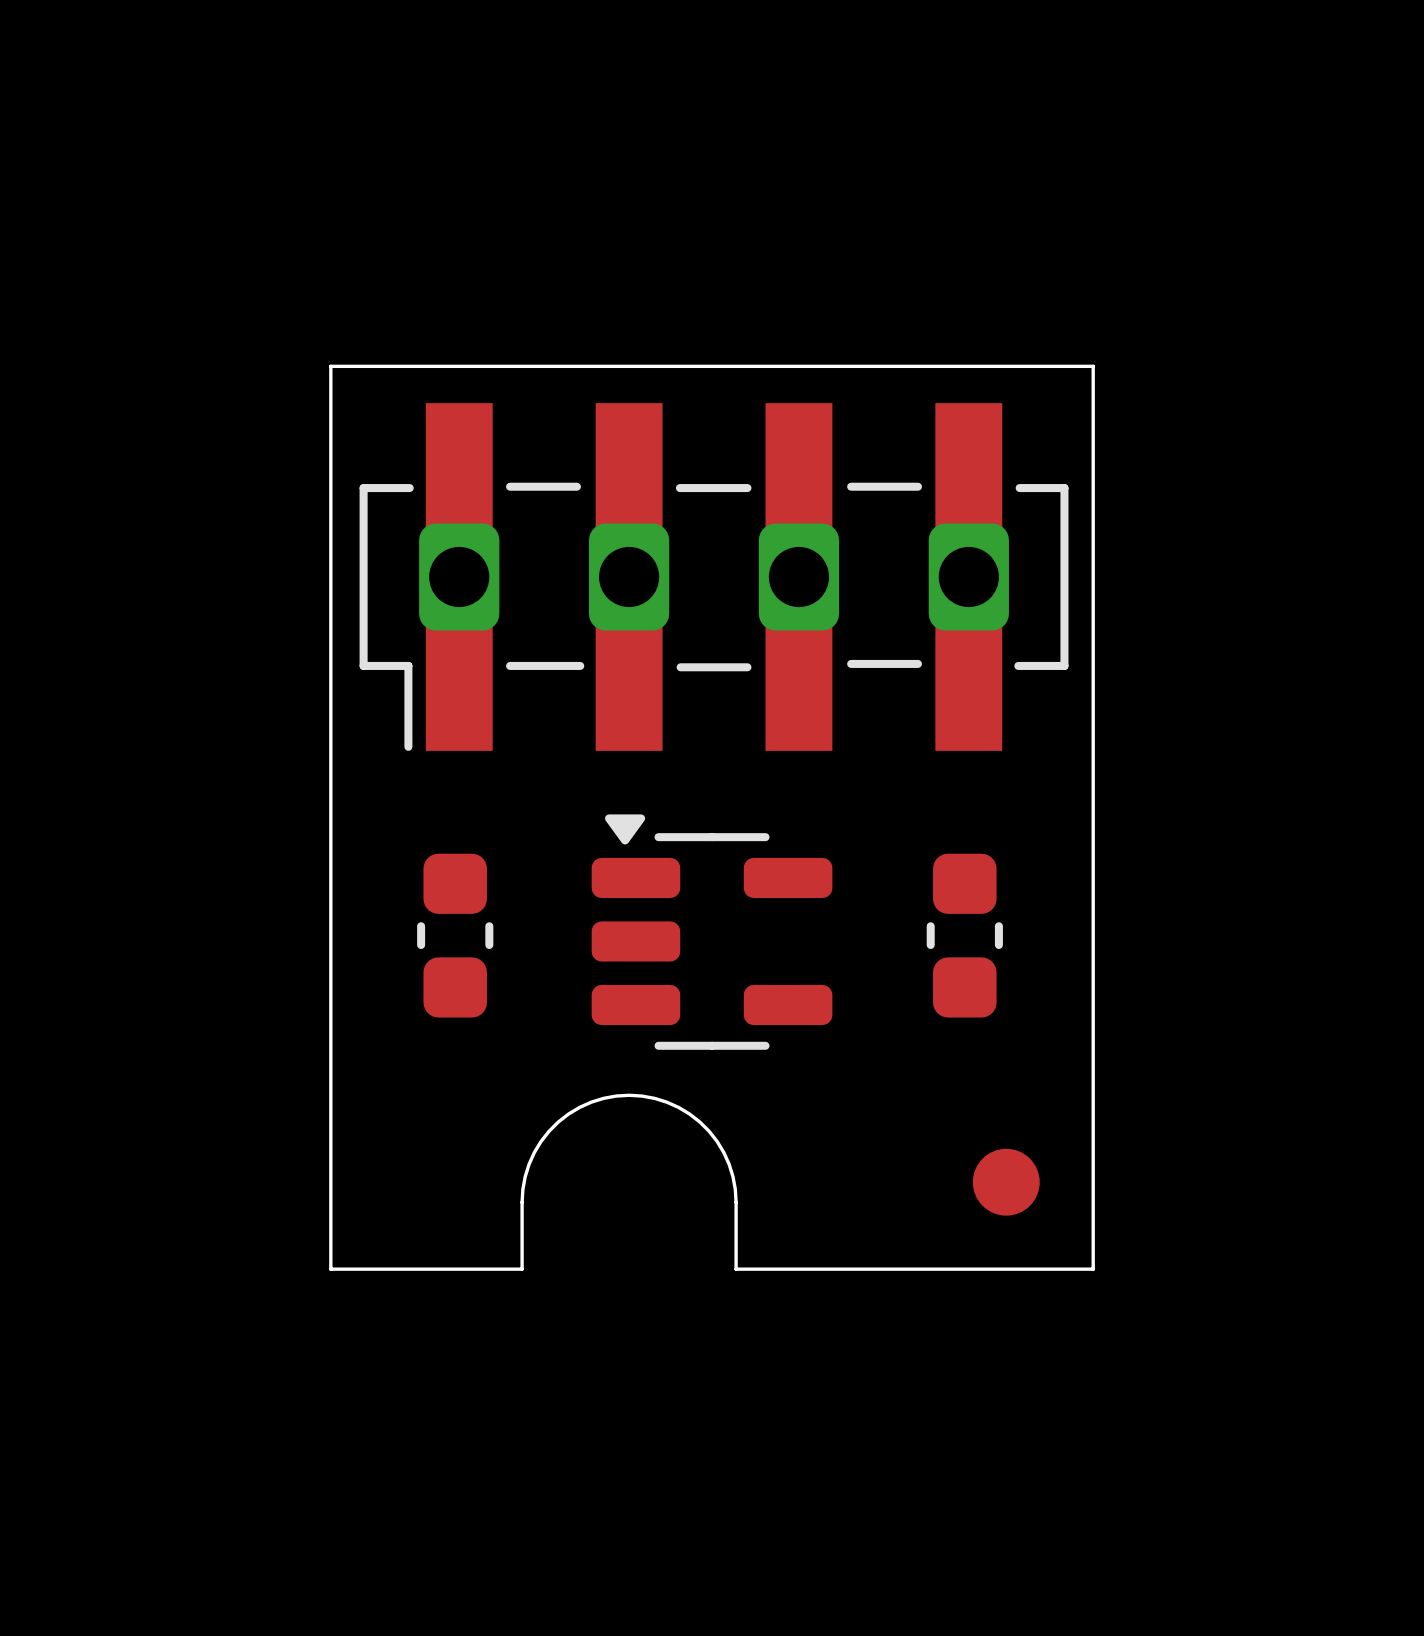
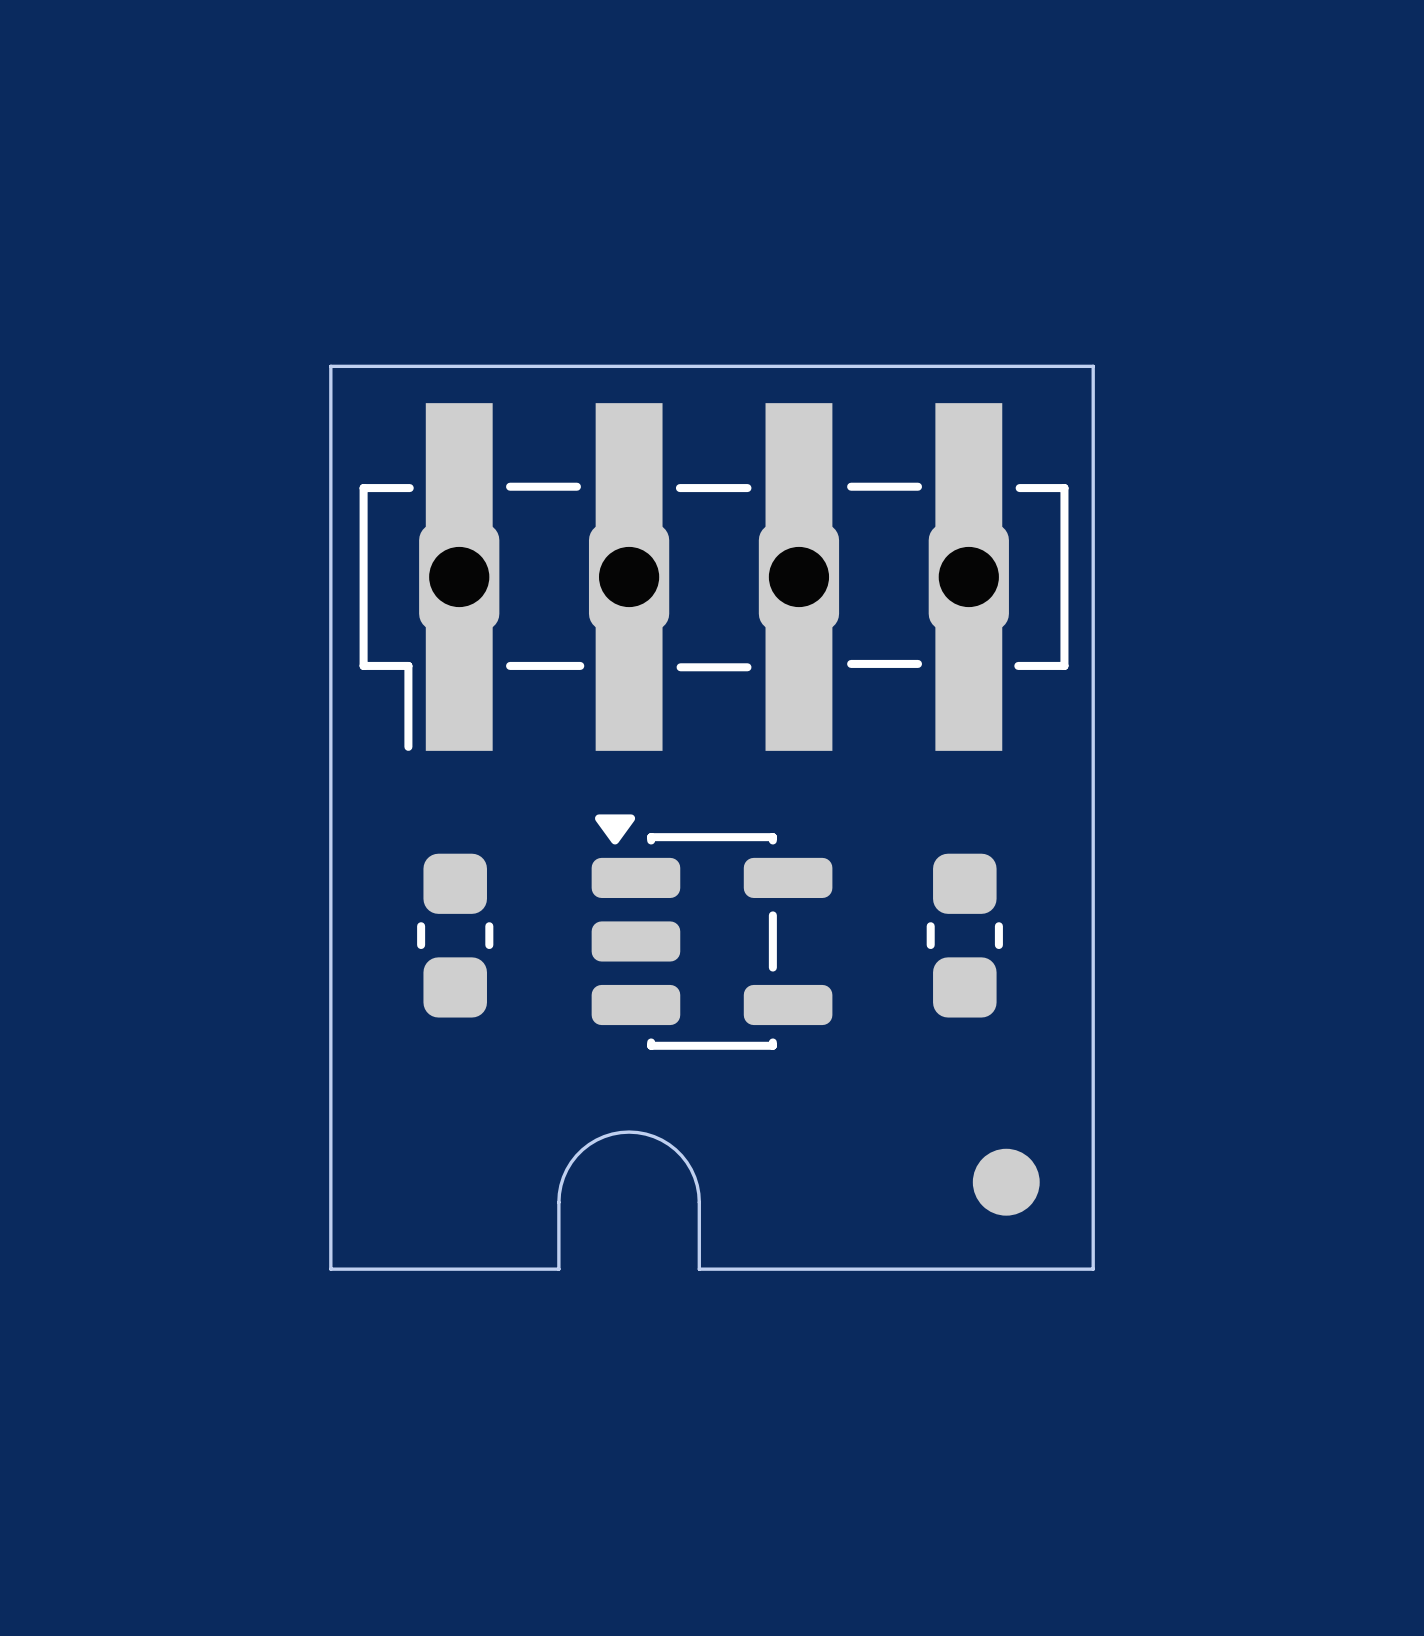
part footprint: [591, 814, 833, 1050] -> [591, 814, 833, 1050]
board edge: (522, 1269) (522, 1189) (529, 1164) (541, 1141) (558, 1122) (579, 1107) (603, 1098) (629, 1095) (654, 1098) (678, 1107) (700, 1122) (717, 1141) (729, 1164) (735, 1189) (736, 1269) -> (522, 1269) (558, 1269) (559, 1193) (566, 1169) (576, 1155) (589, 1144) (604, 1136) (629, 1132) (645, 1134) (661, 1140) (675, 1149) (691, 1169) (698, 1193) (699, 1269) (736, 1269)

